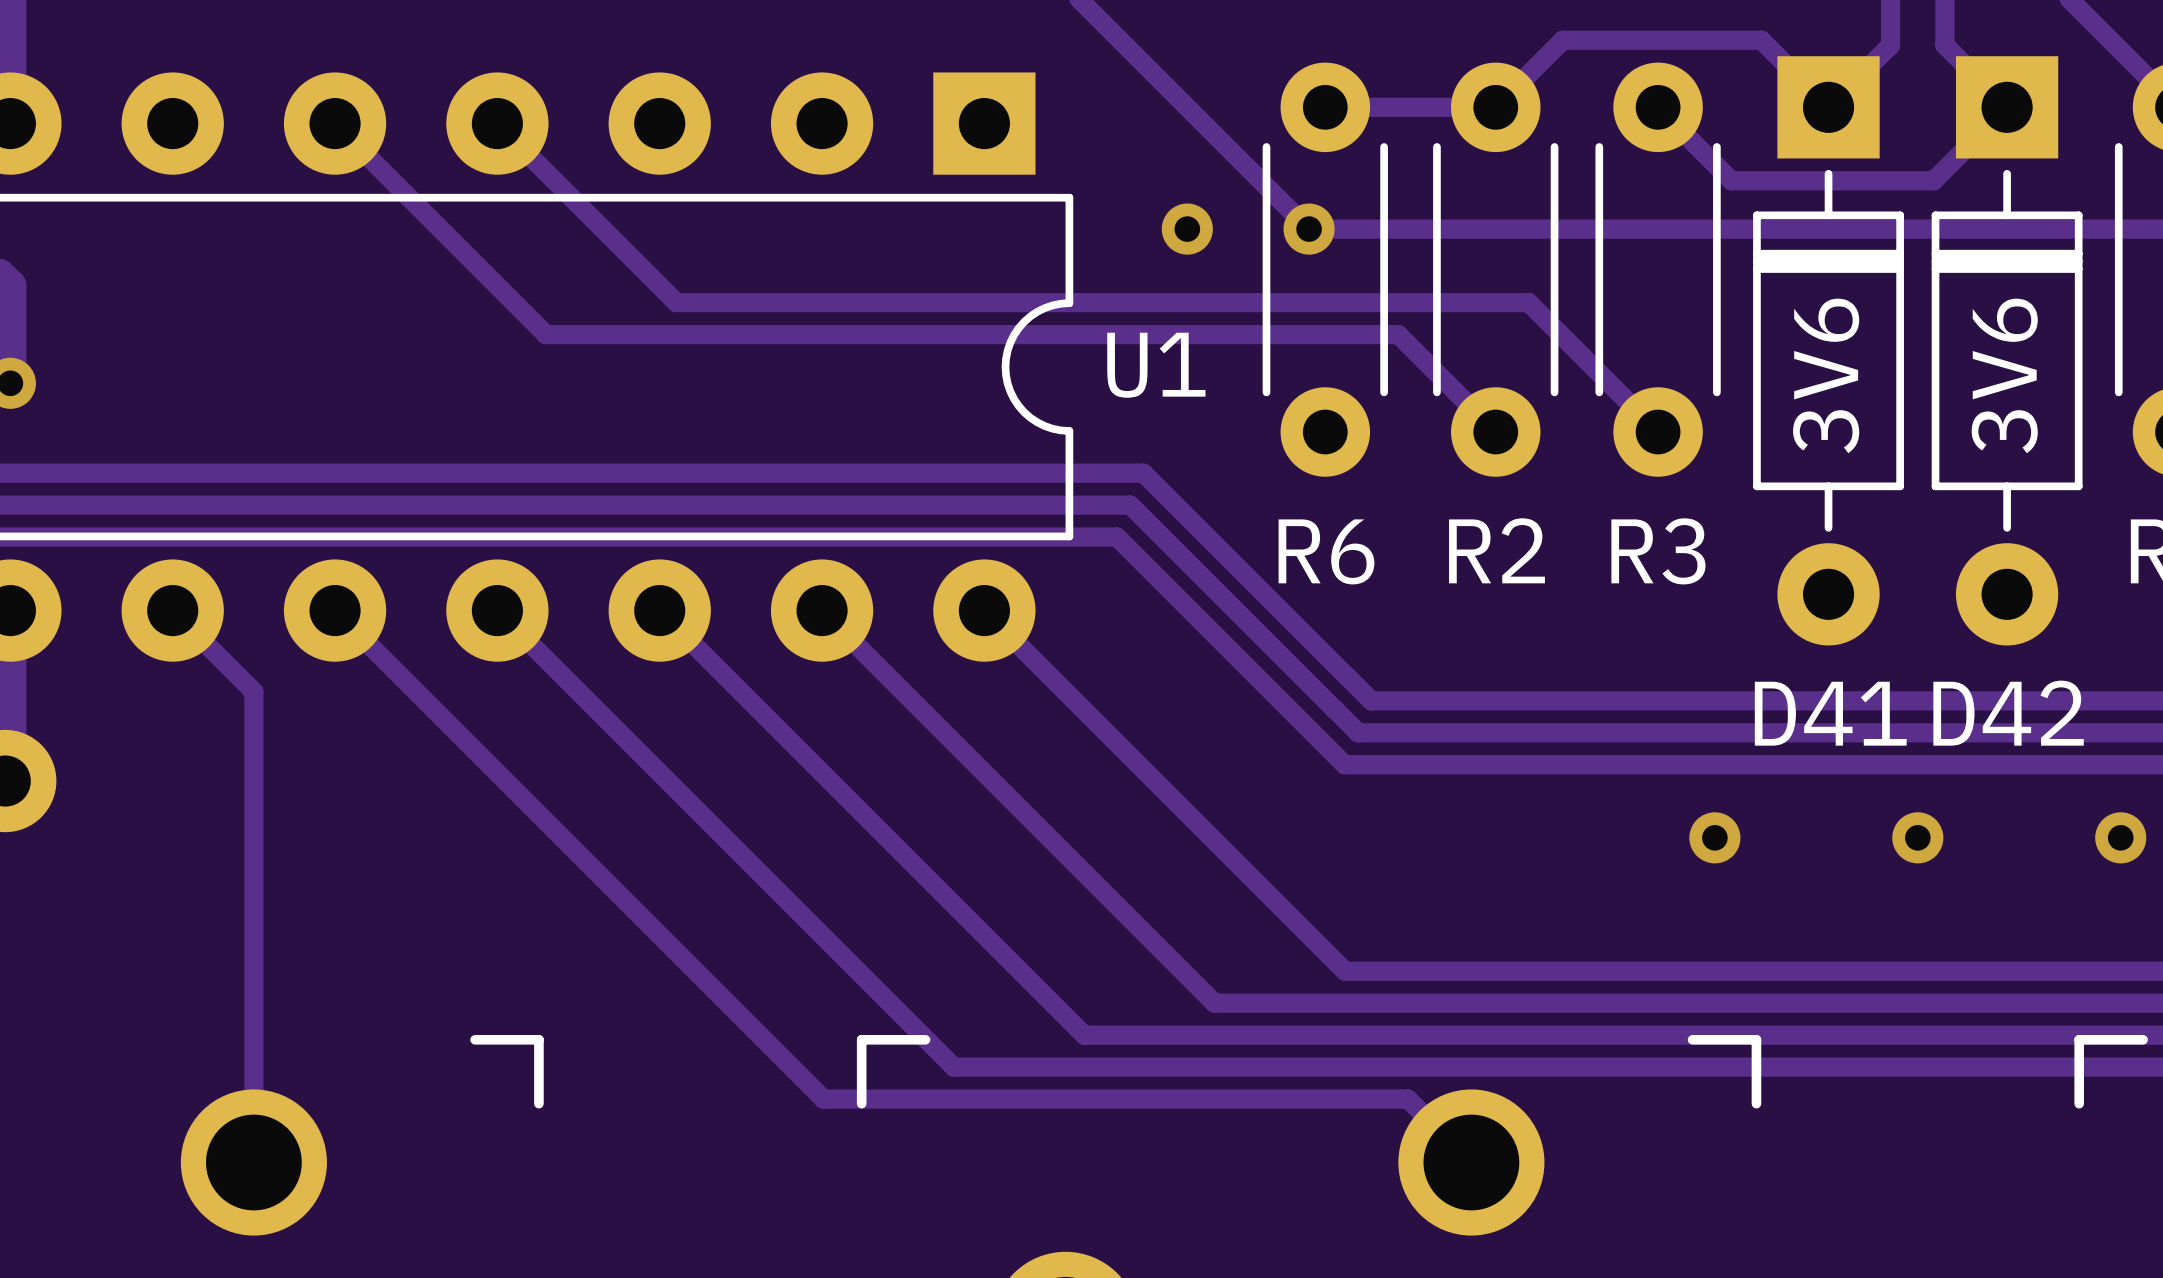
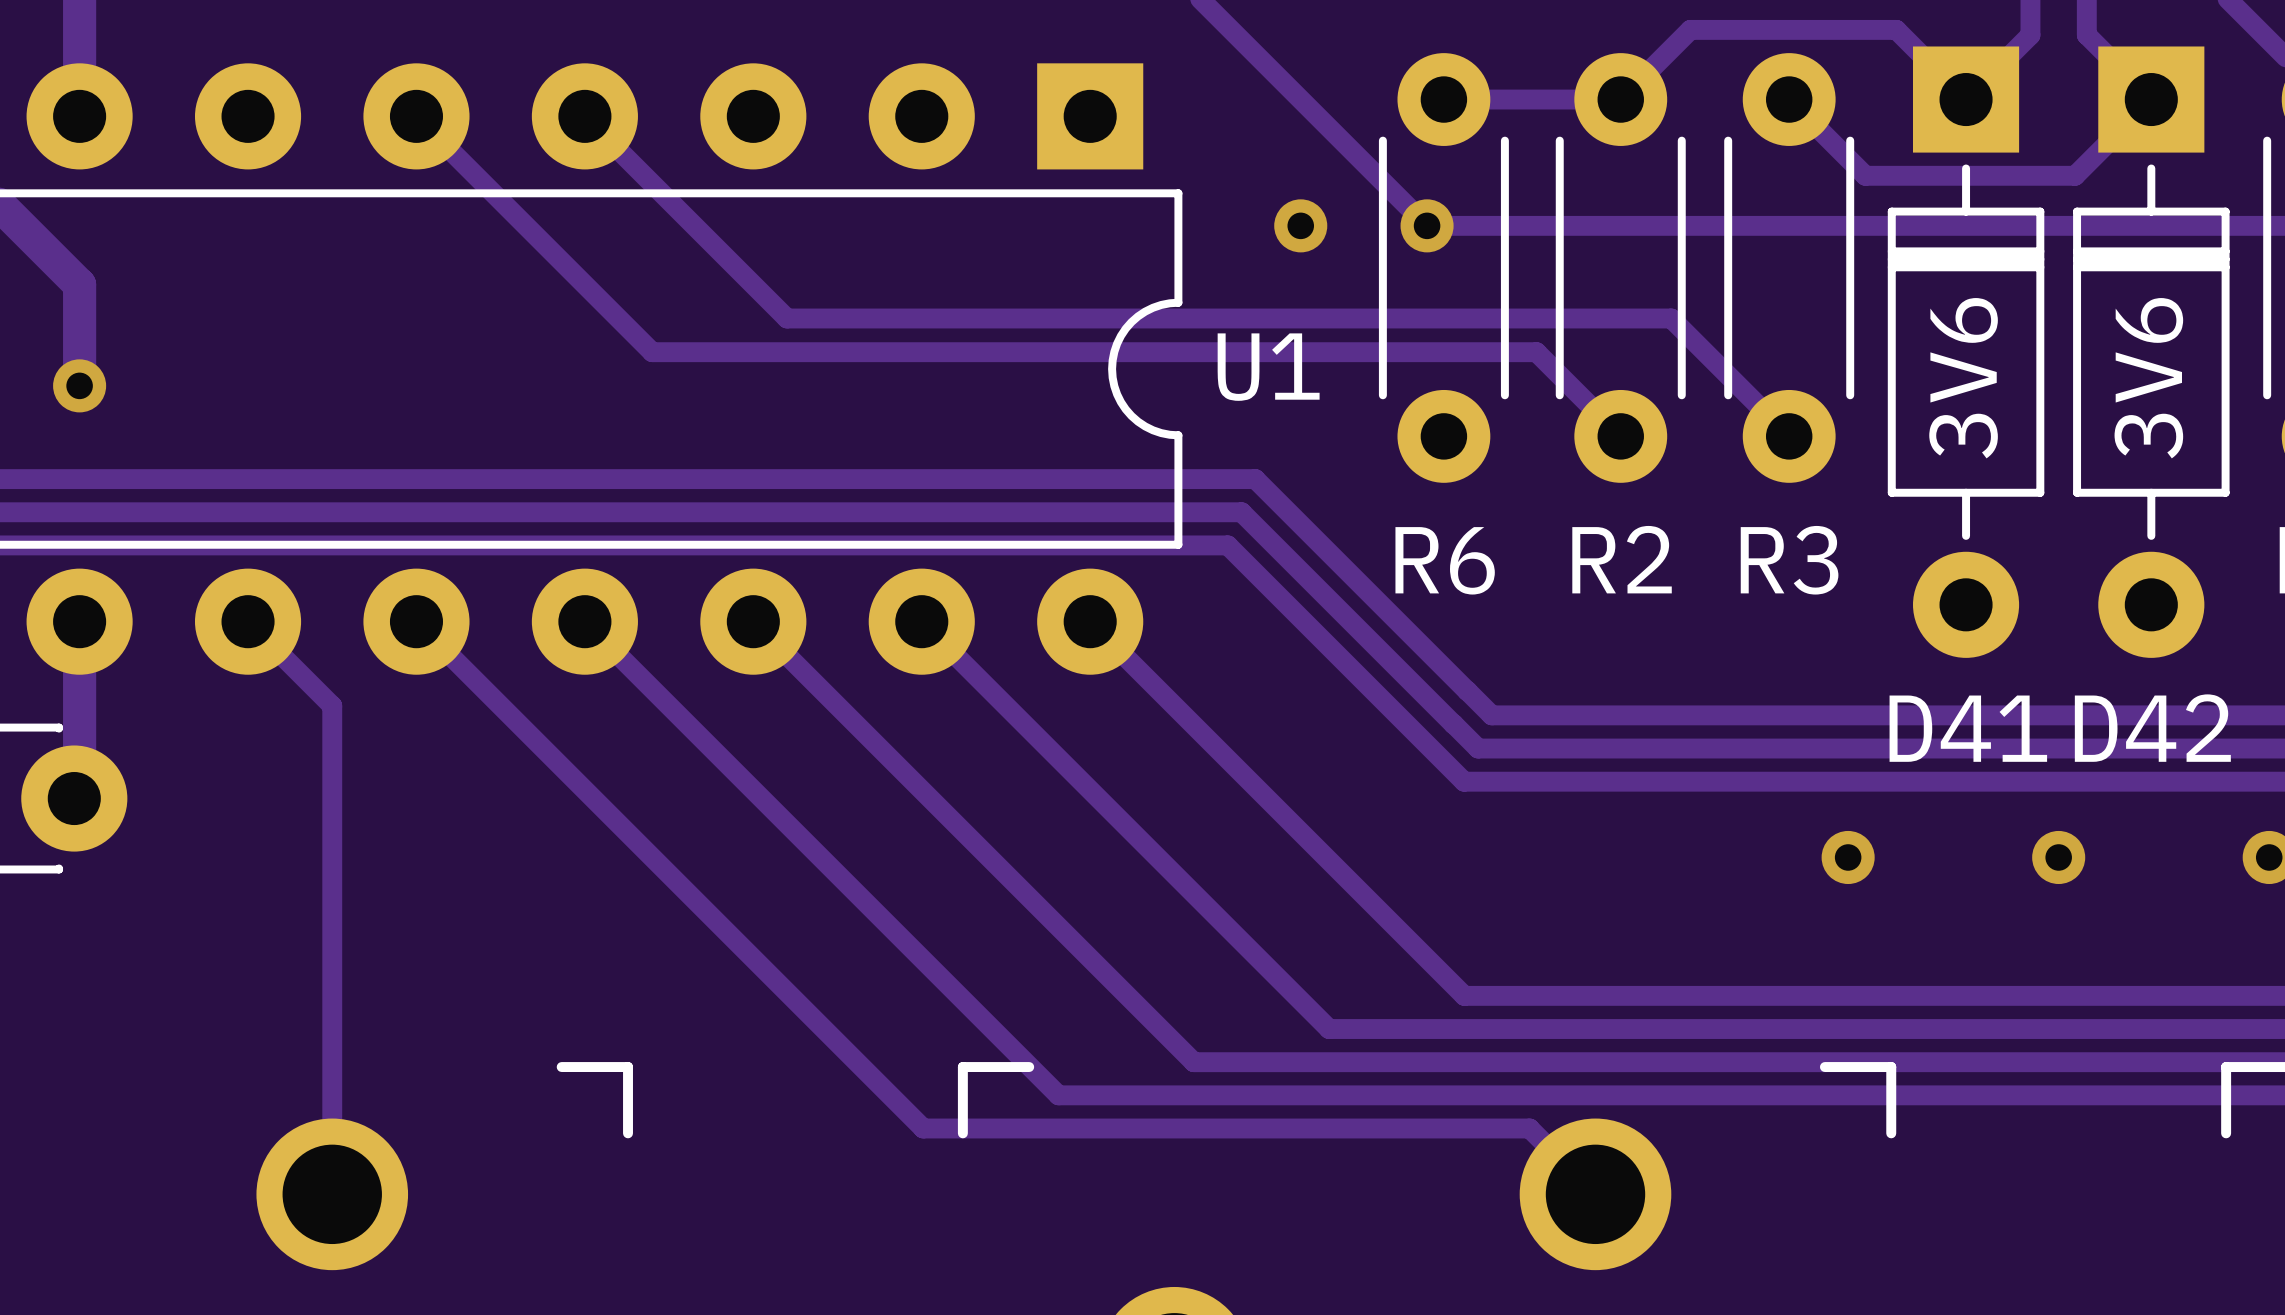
track: (676, 302) (1528, 302) (1544, 318) -> (770, 302) (787, 318) (1671, 318)
track: (546, 334) (1398, 334) (1414, 350) -> (635, 335) (652, 352) (1536, 352)

